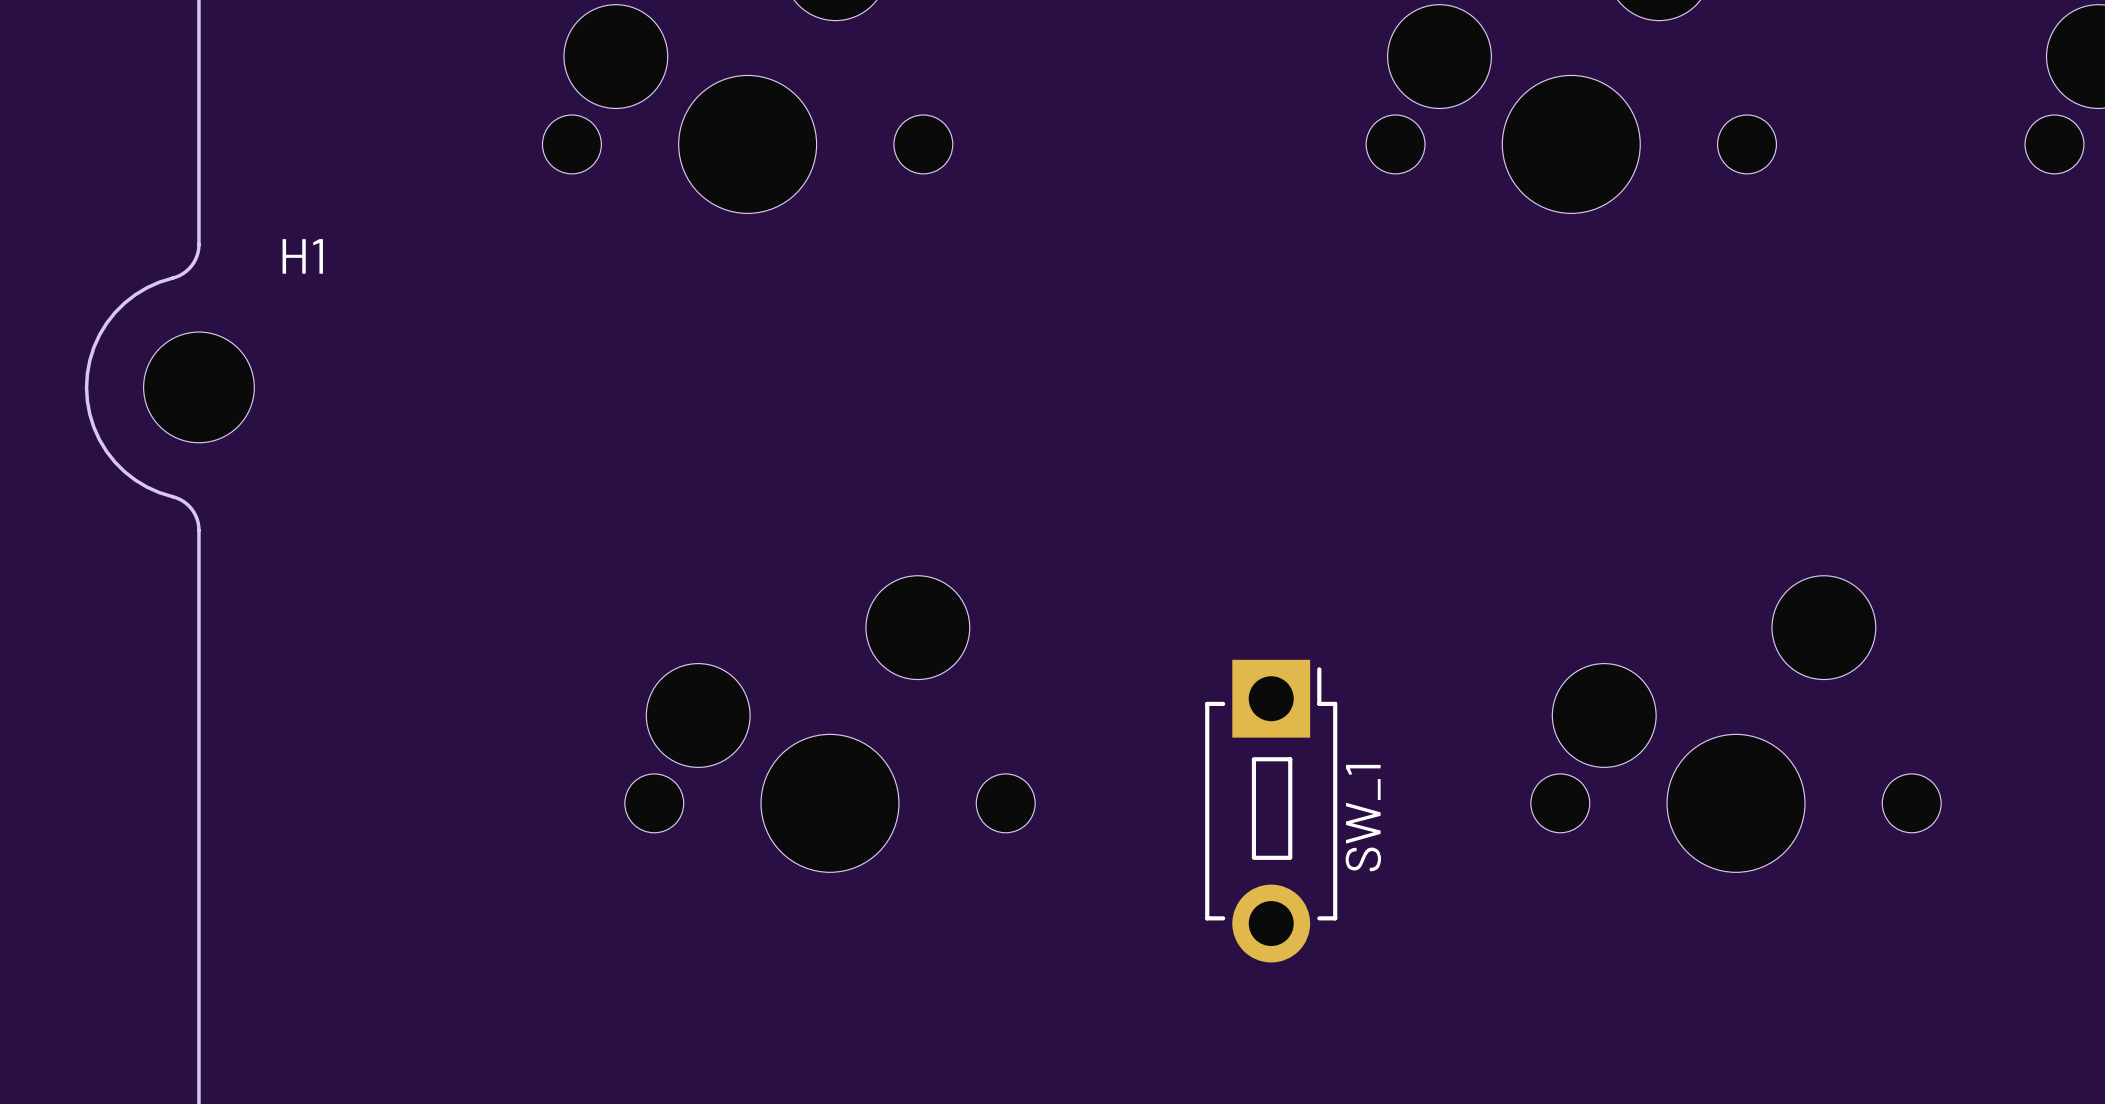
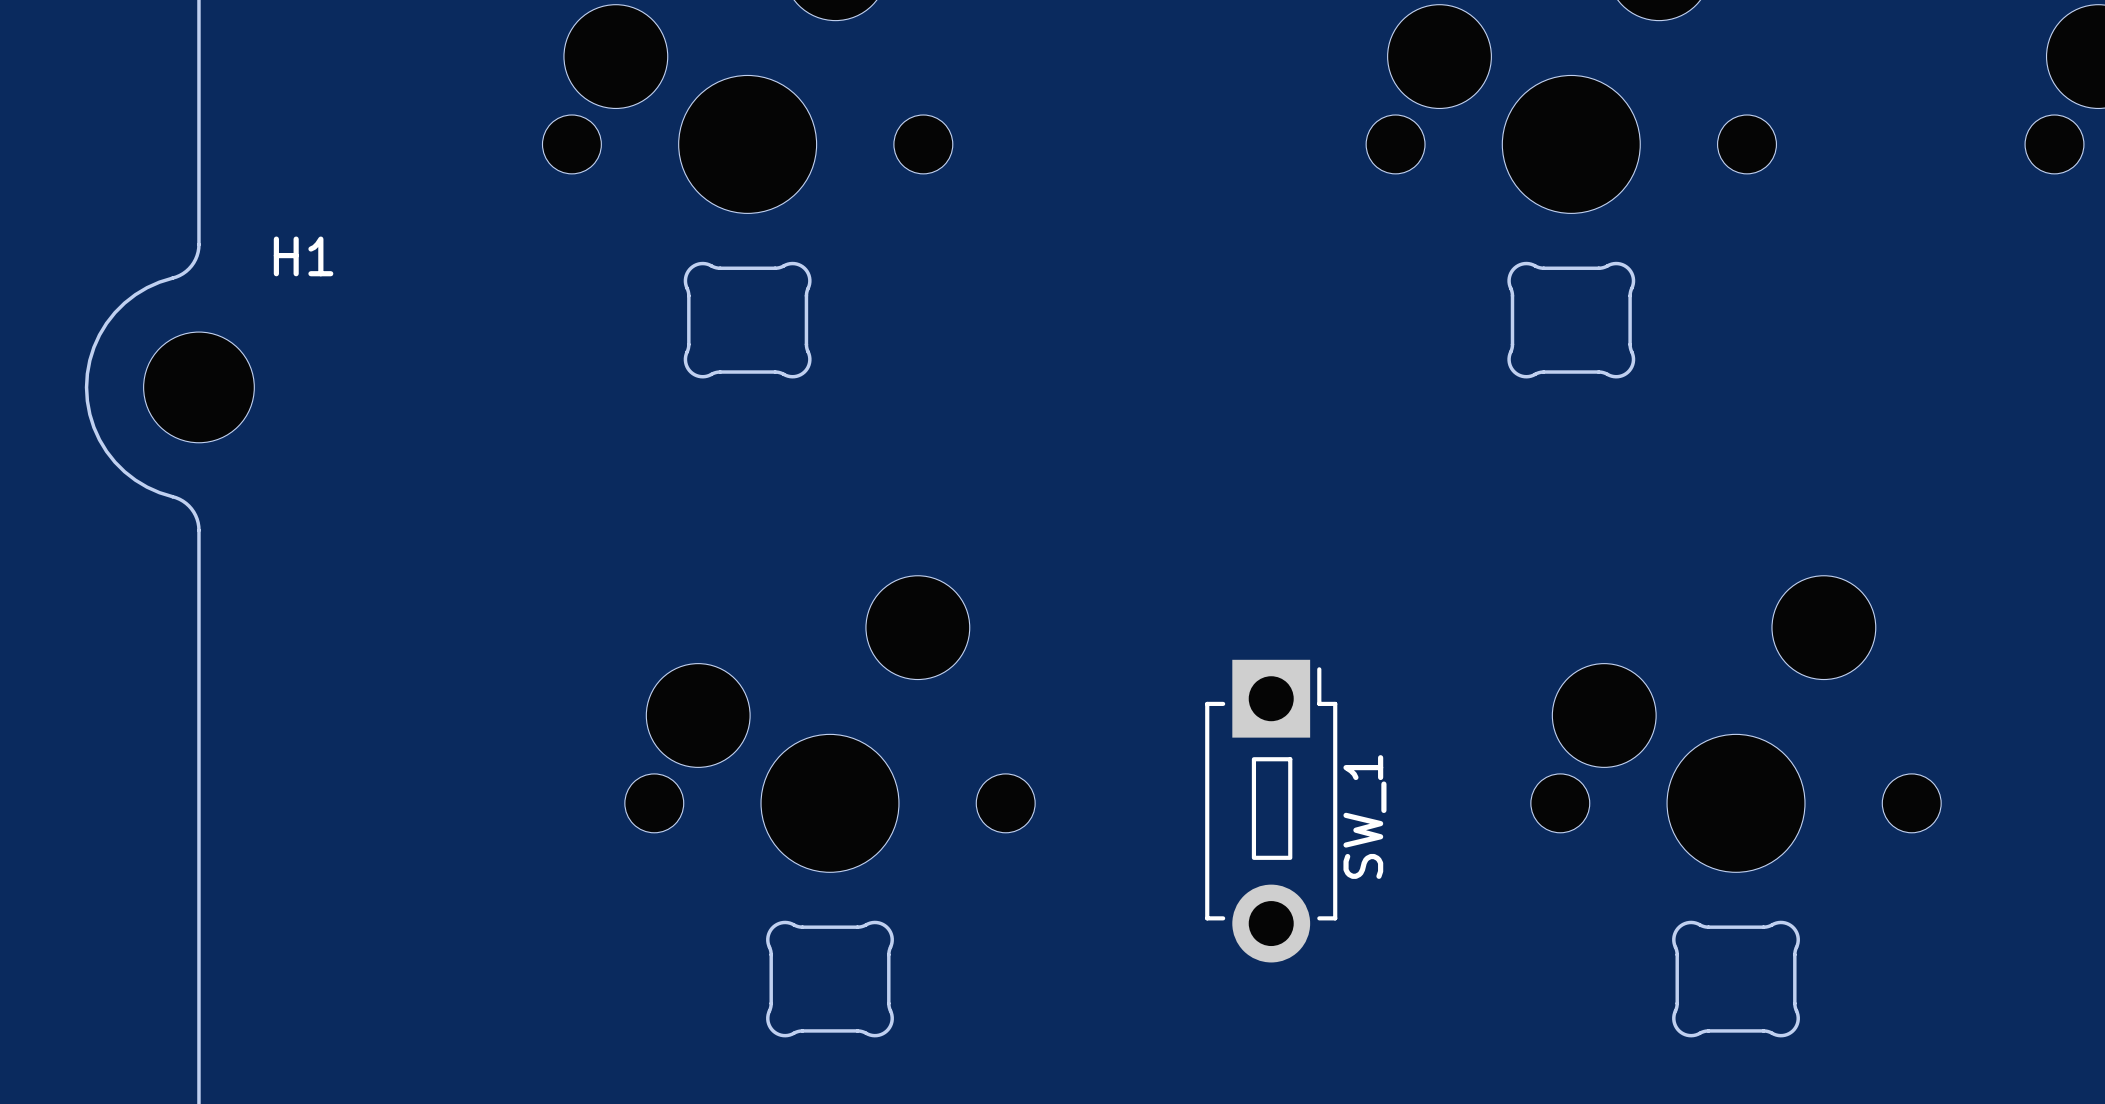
part: none -> (747, 320)
part: none -> (1571, 320)
part: none -> (830, 979)
part: none -> (1736, 979)

